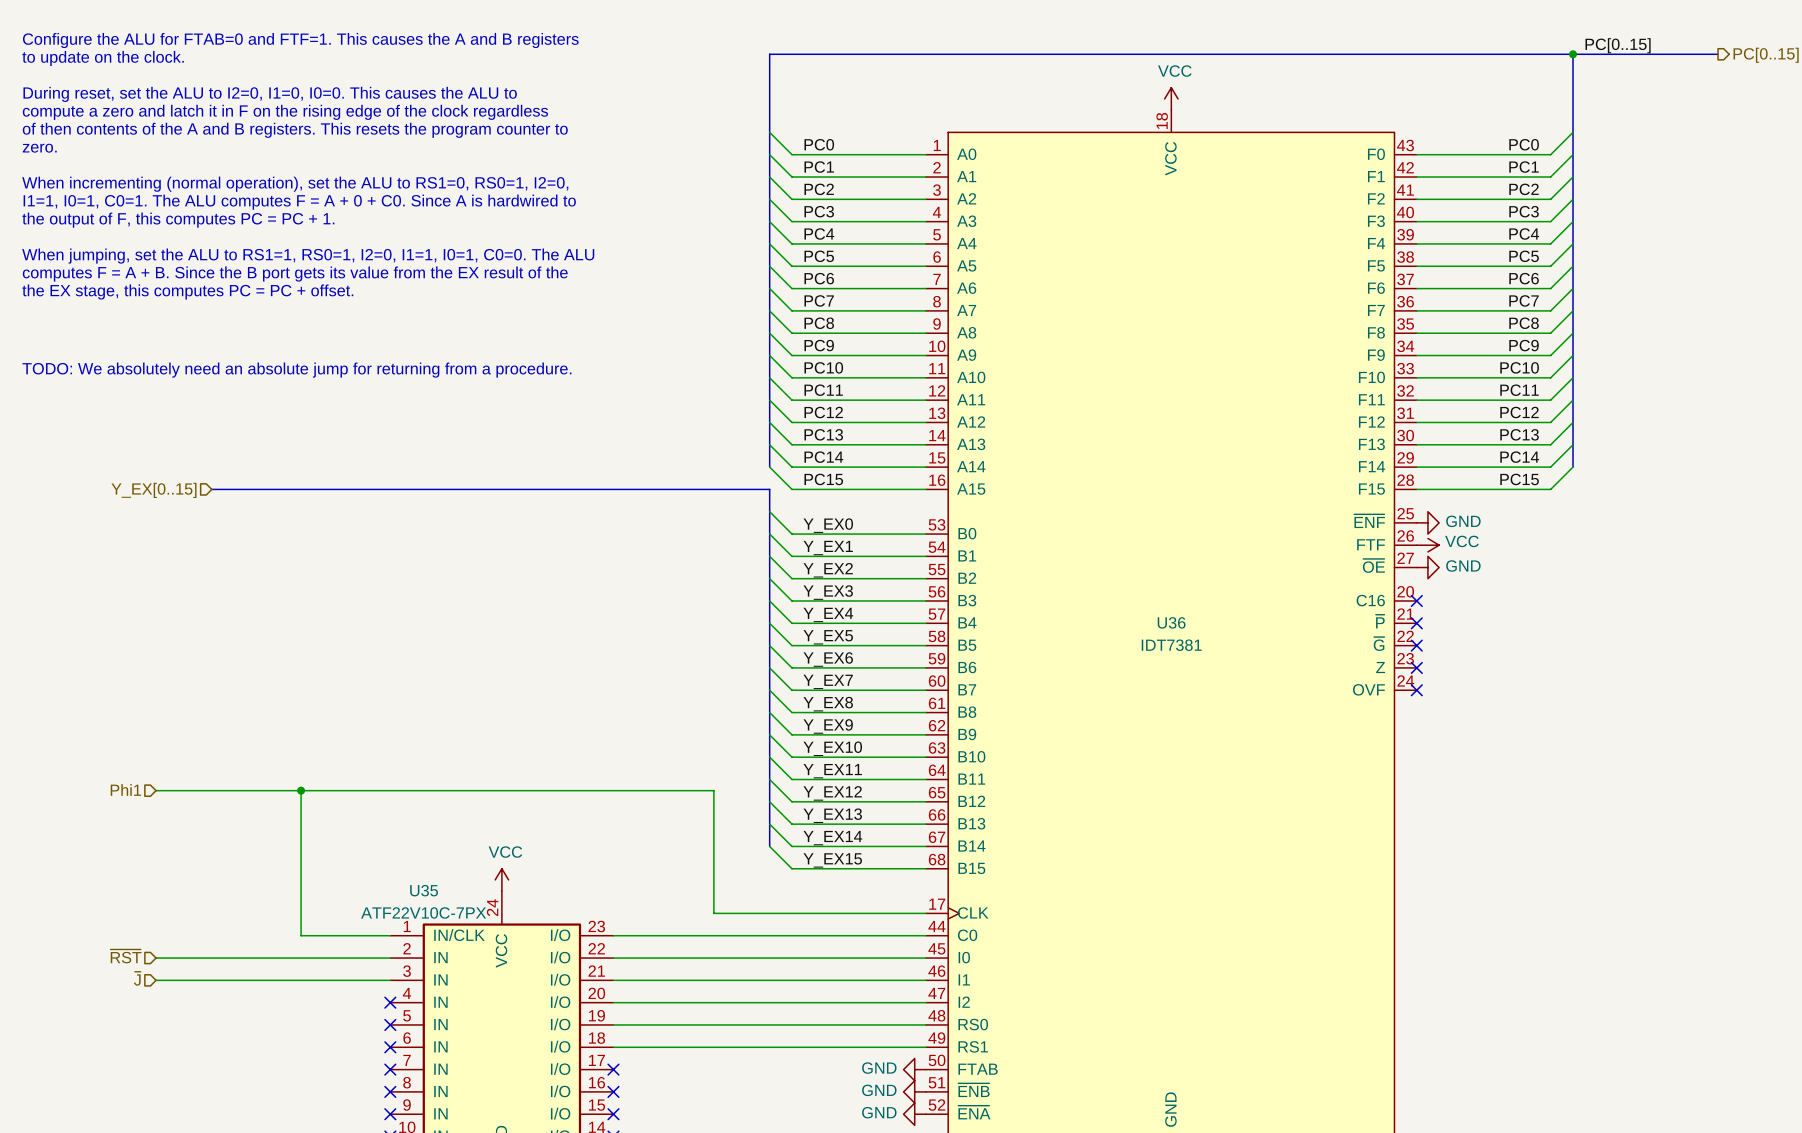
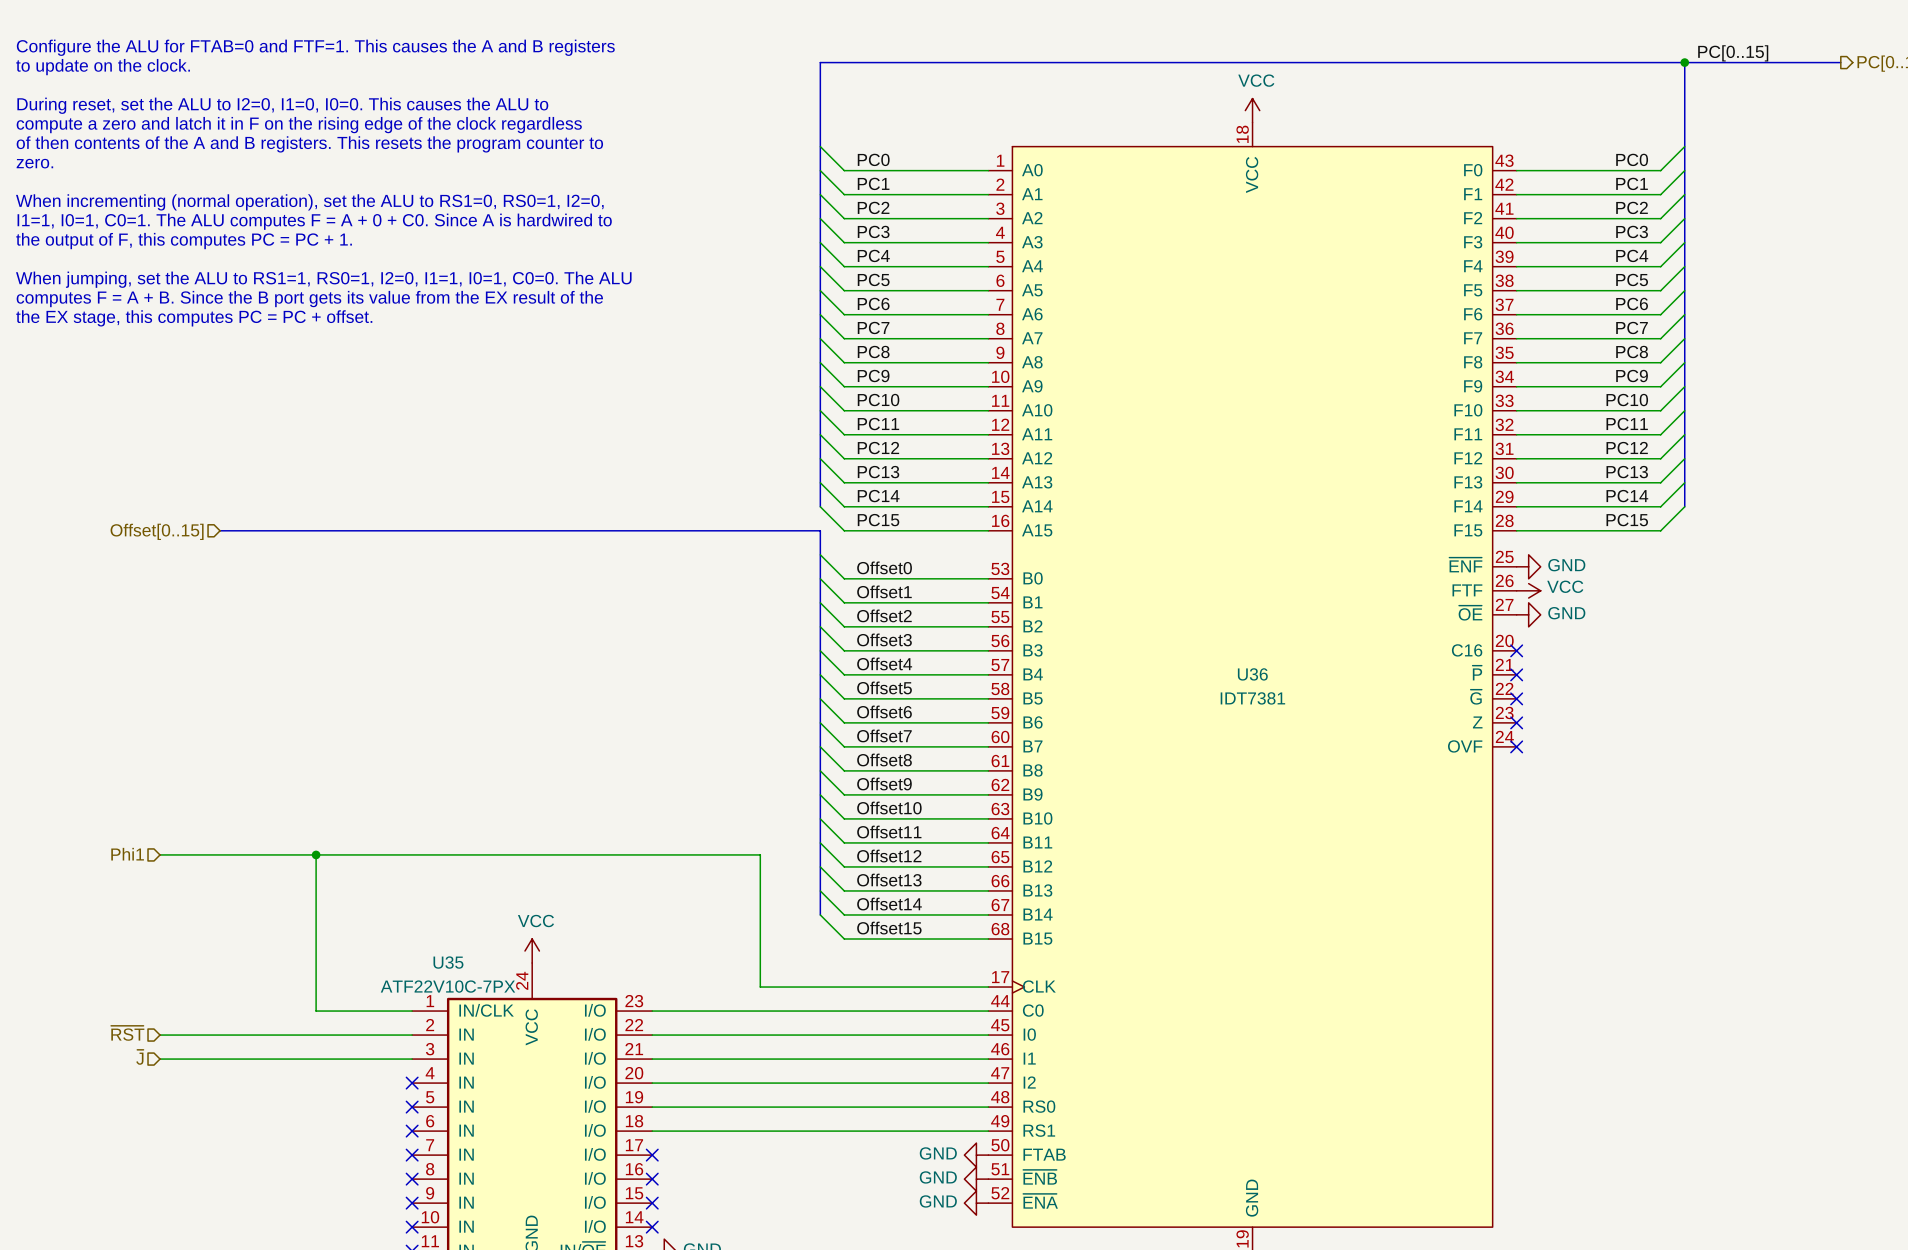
text: TODO: We absolutely need an absolute jump for returning from a procedure. (296, 370) -> none
hierarchical label: Y_EX[0..15] (153, 490) -> Offset[0..15] (157, 531)
label: Y_EX0 (828, 525) -> Offset0 (884, 567)
label: Y_EX1 (828, 548) -> Offset1 (884, 591)
label: Y_EX2 (828, 570) -> Offset2 (884, 615)
label: Y_EX3 (828, 592) -> Offset3 (884, 639)
label: Y_EX4 (828, 614) -> Offset4 (884, 663)
label: Y_EX5 (828, 637) -> Offset5 (884, 687)
label: Y_EX6 (828, 659) -> Offset6 (884, 711)
label: Y_EX7 (828, 681) -> Offset7 (884, 735)
label: Y_EX8 (828, 704) -> Offset8 (884, 759)
label: Y_EX9 (828, 726) -> Offset9 (884, 783)
label: Y_EX10 (832, 748) -> Offset10 (889, 808)
label: Y_EX11 (832, 771) -> Offset11 (889, 832)
label: Y_EX12 (832, 793) -> Offset12 (889, 856)
label: Y_EX13 (832, 815) -> Offset13 (889, 880)
label: Y_EX14 (832, 838) -> Offset14 (889, 904)
label: Y_EX15 (832, 860) -> Offset15 (889, 928)

